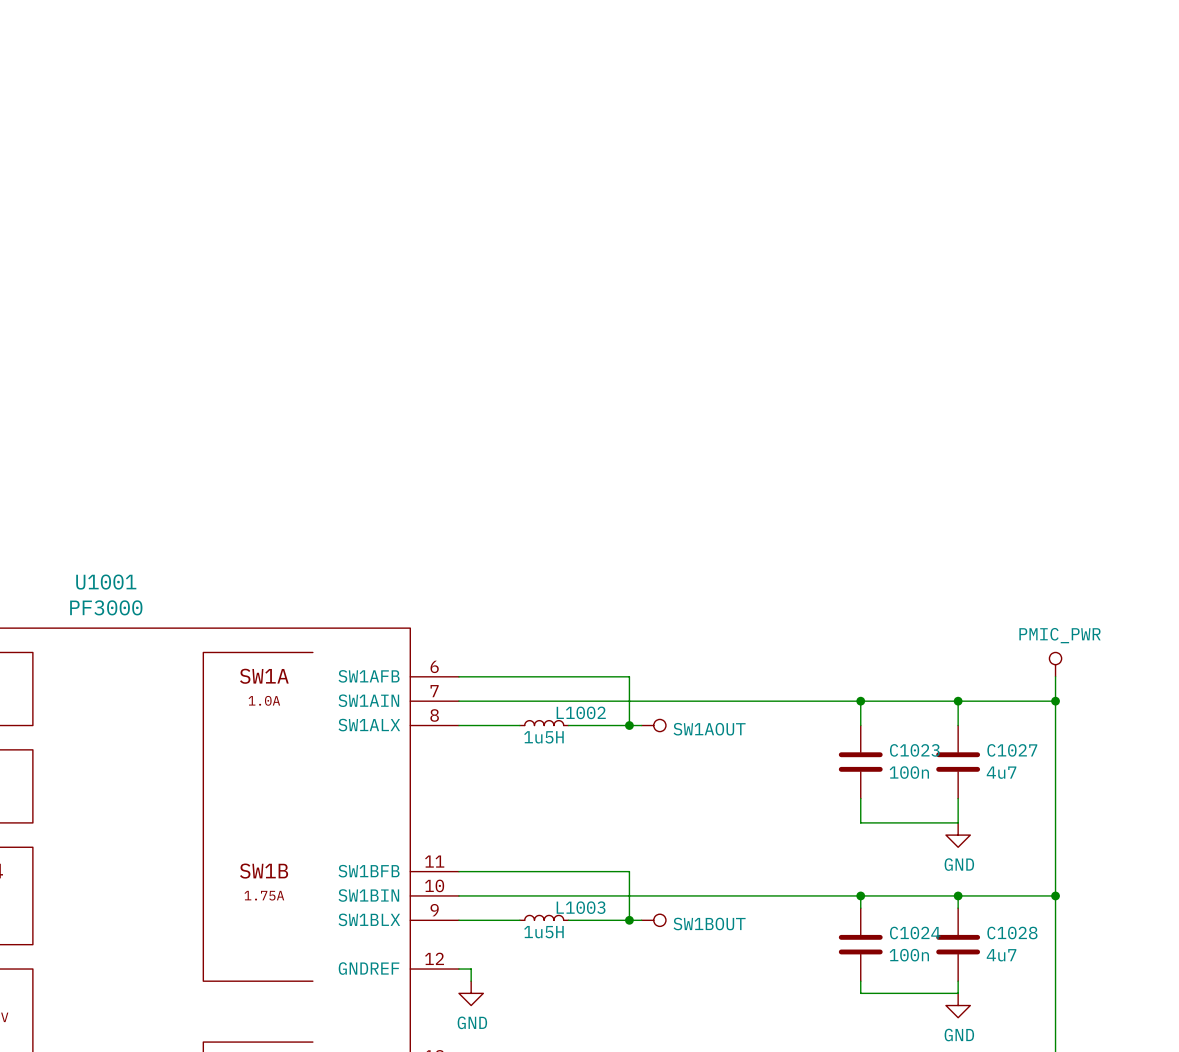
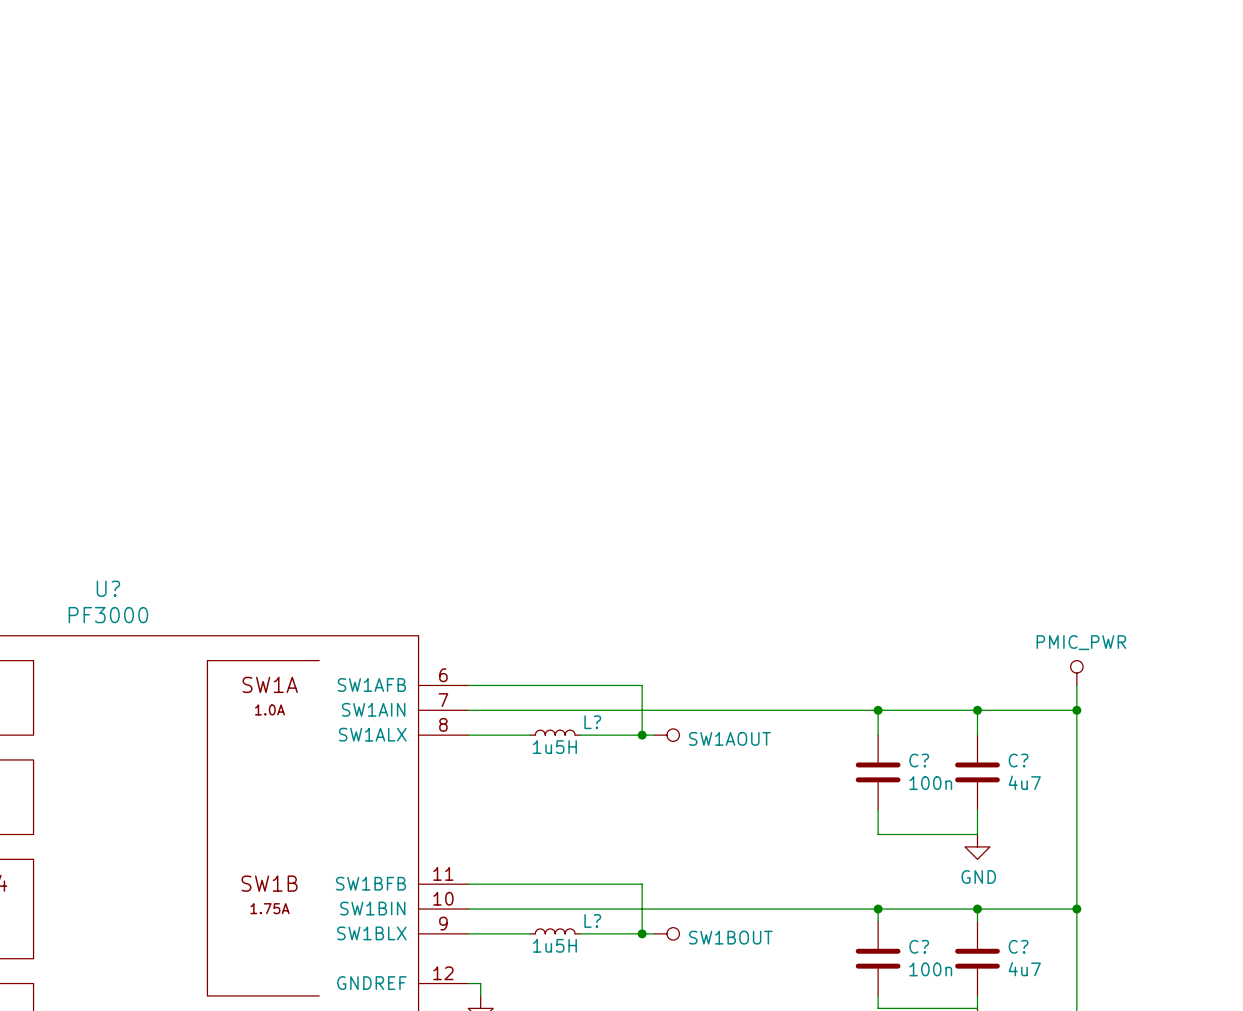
U1001 name: U1001 (106, 582) -> U? (108, 588)
L1002 name: L1002 (581, 712) -> L? (592, 722)
C1023 name: C1023 (914, 750) -> C? (919, 760)
C1027 name: C1027 (1012, 750) -> C? (1018, 760)
L1003 name: L1003 (581, 907) -> L? (592, 920)
C1024 name: C1024 (915, 933) -> C? (919, 946)
C1028 name: C1028 (1012, 933) -> C? (1018, 946)

